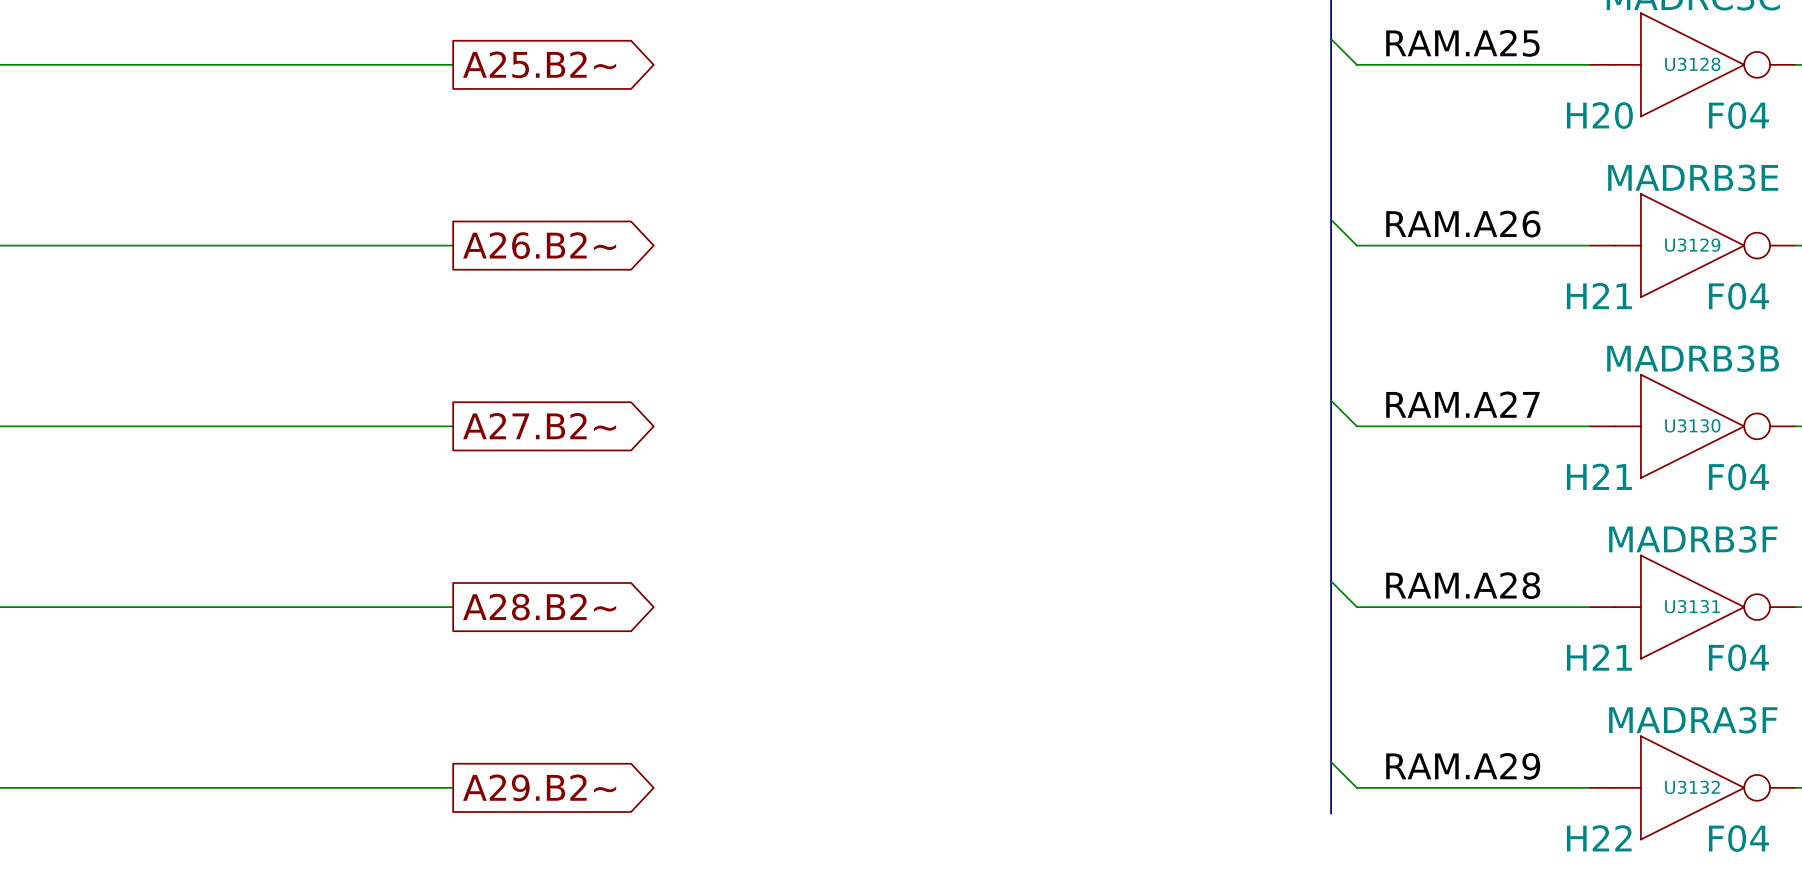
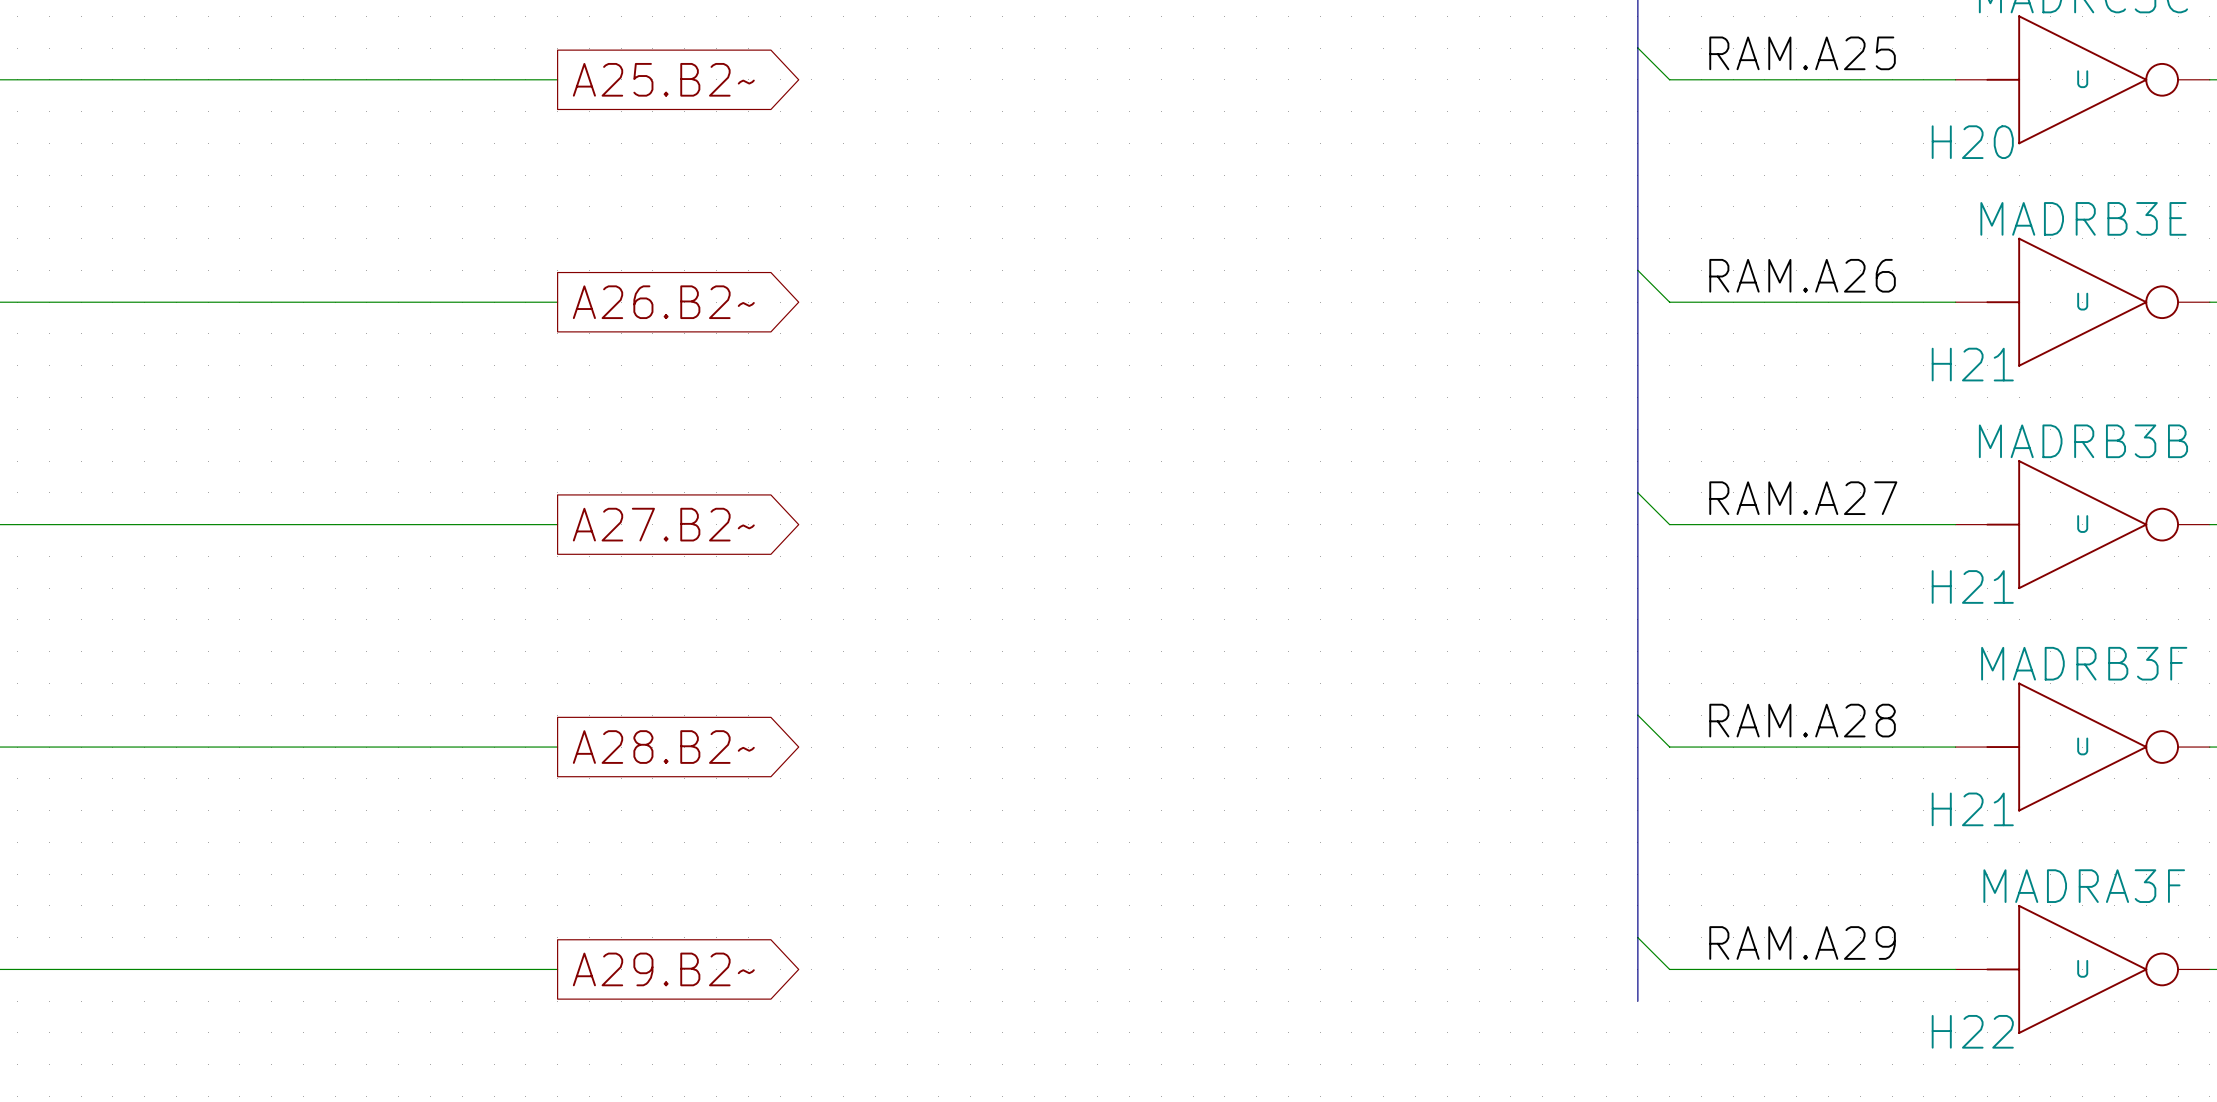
U3128 name: U3128 (1692, 64) -> U (2082, 79)
U3128 value: F04 (1738, 115) -> none
U3129 name: U3129 (1692, 245) -> U (2082, 301)
U3129 value: F04 (1738, 296) -> none
U3130 name: U3130 (1692, 425) -> U (2082, 524)
U3130 value: F04 (1738, 477) -> none
U3131 name: U3131 (1692, 606) -> U (2082, 746)
U3131 value: F04 (1738, 657) -> none
U3132 name: U3132 (1692, 787) -> U (2082, 968)
U3132 value: F04 (1738, 838) -> none

